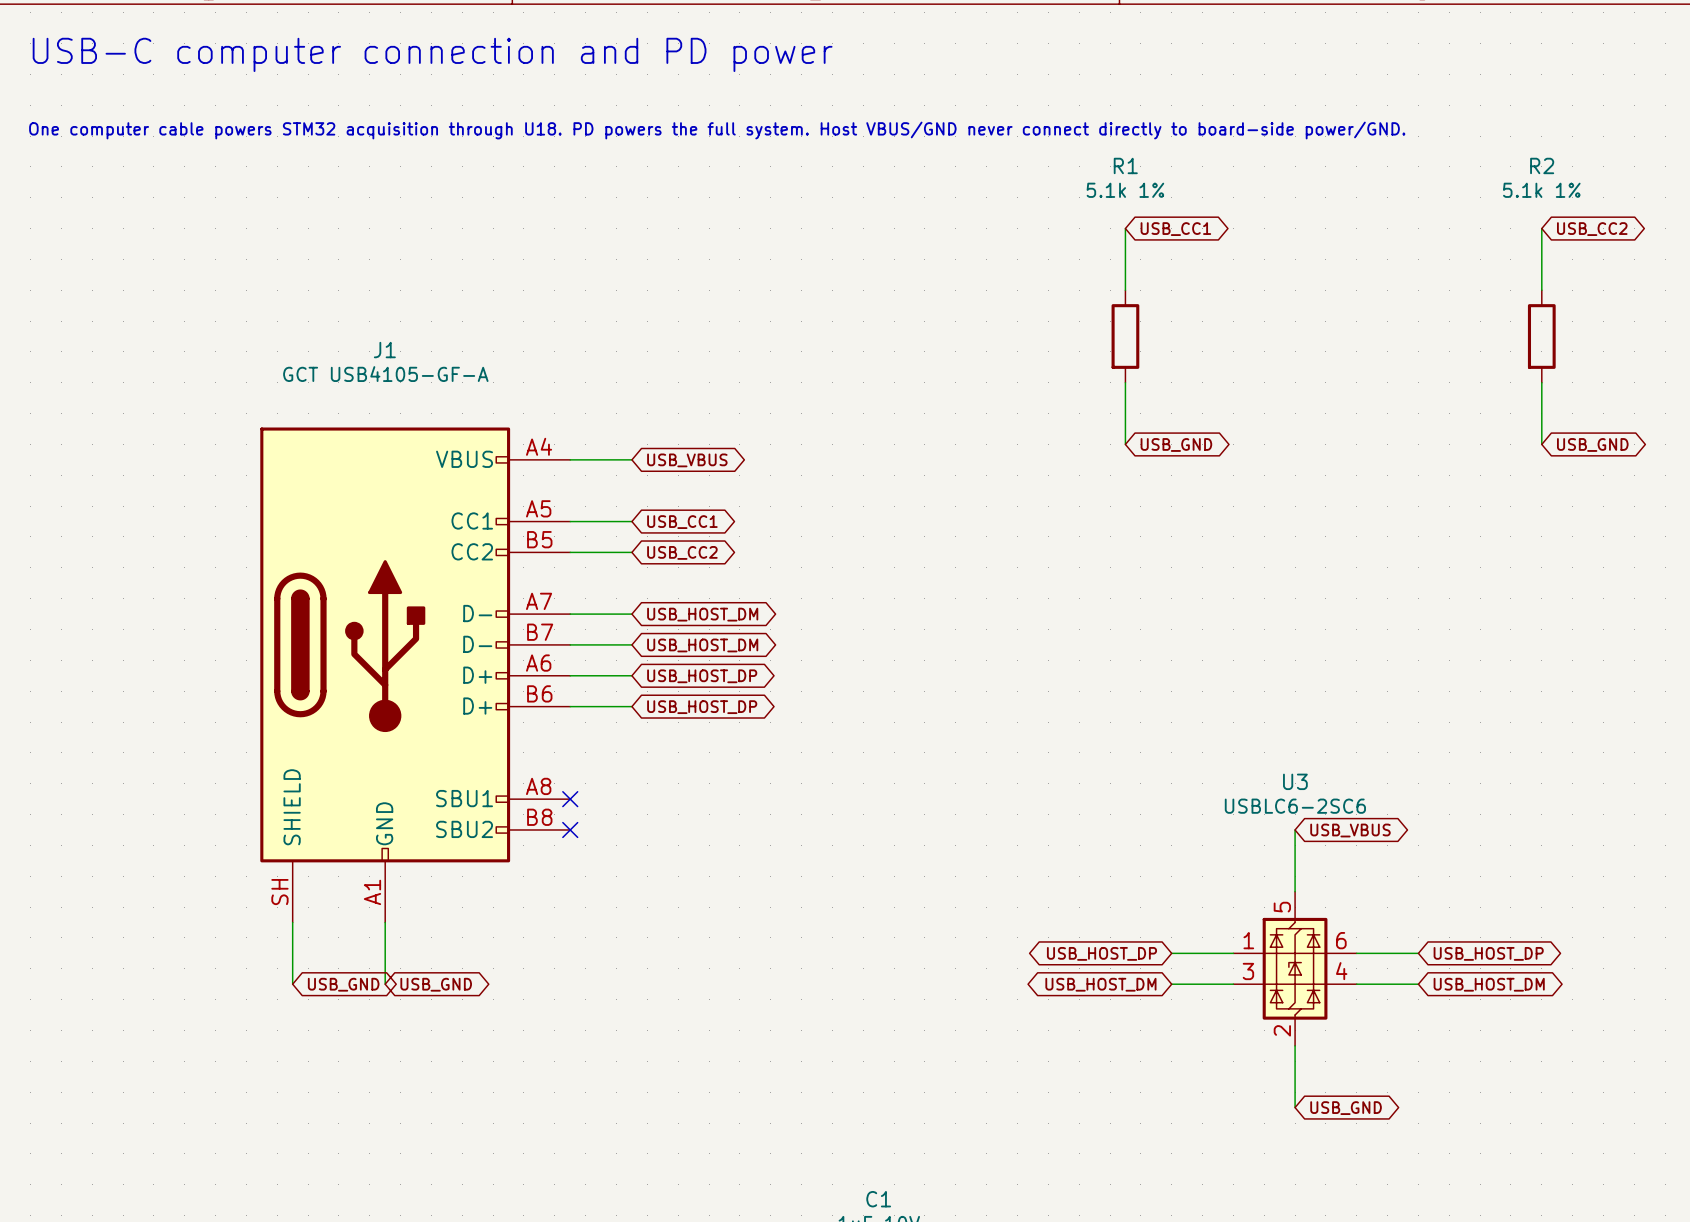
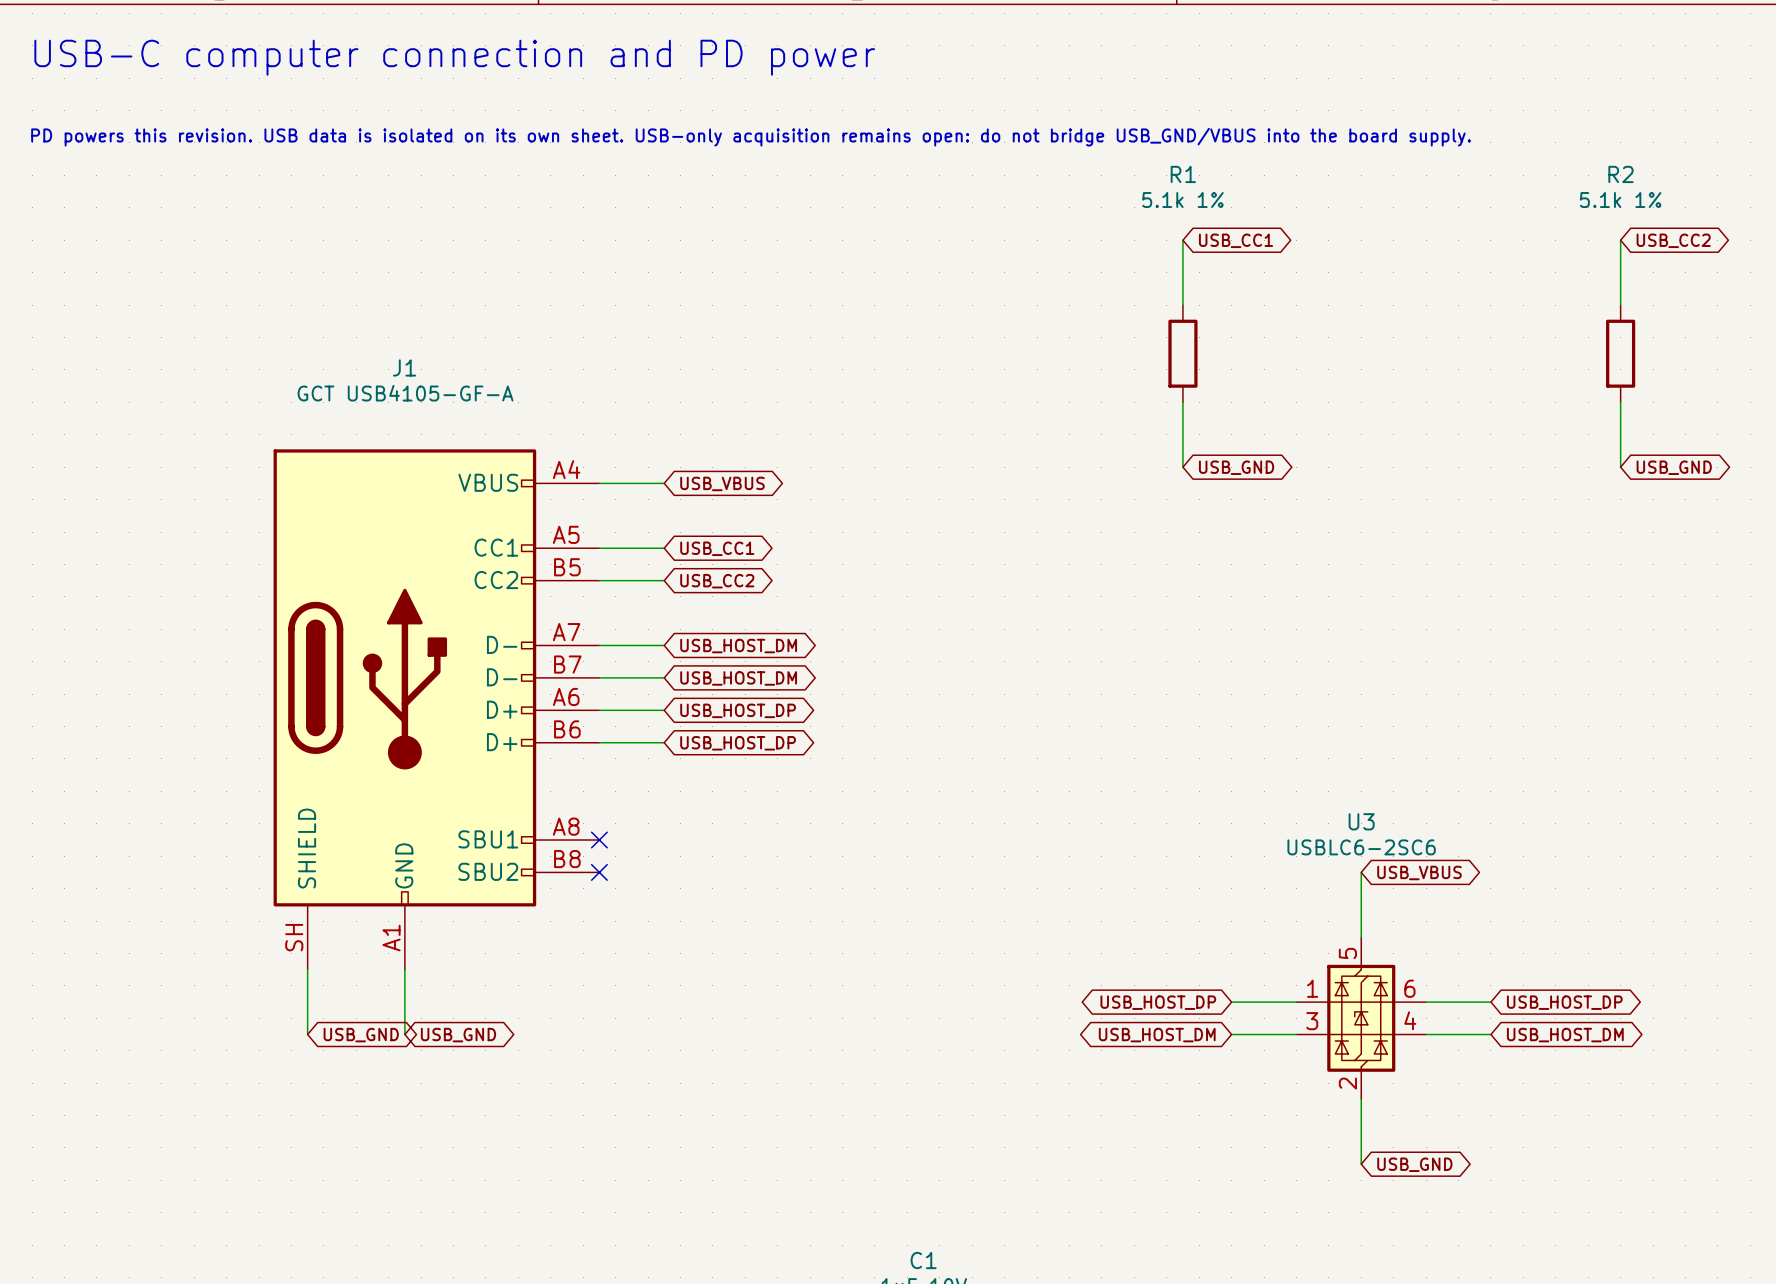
text: One computer cable powers STM32 acquisition through U18. PD powers the full system. Host VBUS/GND never connect directly to board-side power/GND. (717, 130) -> PD powers this revision. USB data is isolated on its own sheet. USB-only acquisition remains open: do not bridge USB_GND/VBUS into the board supply. (751, 137)

